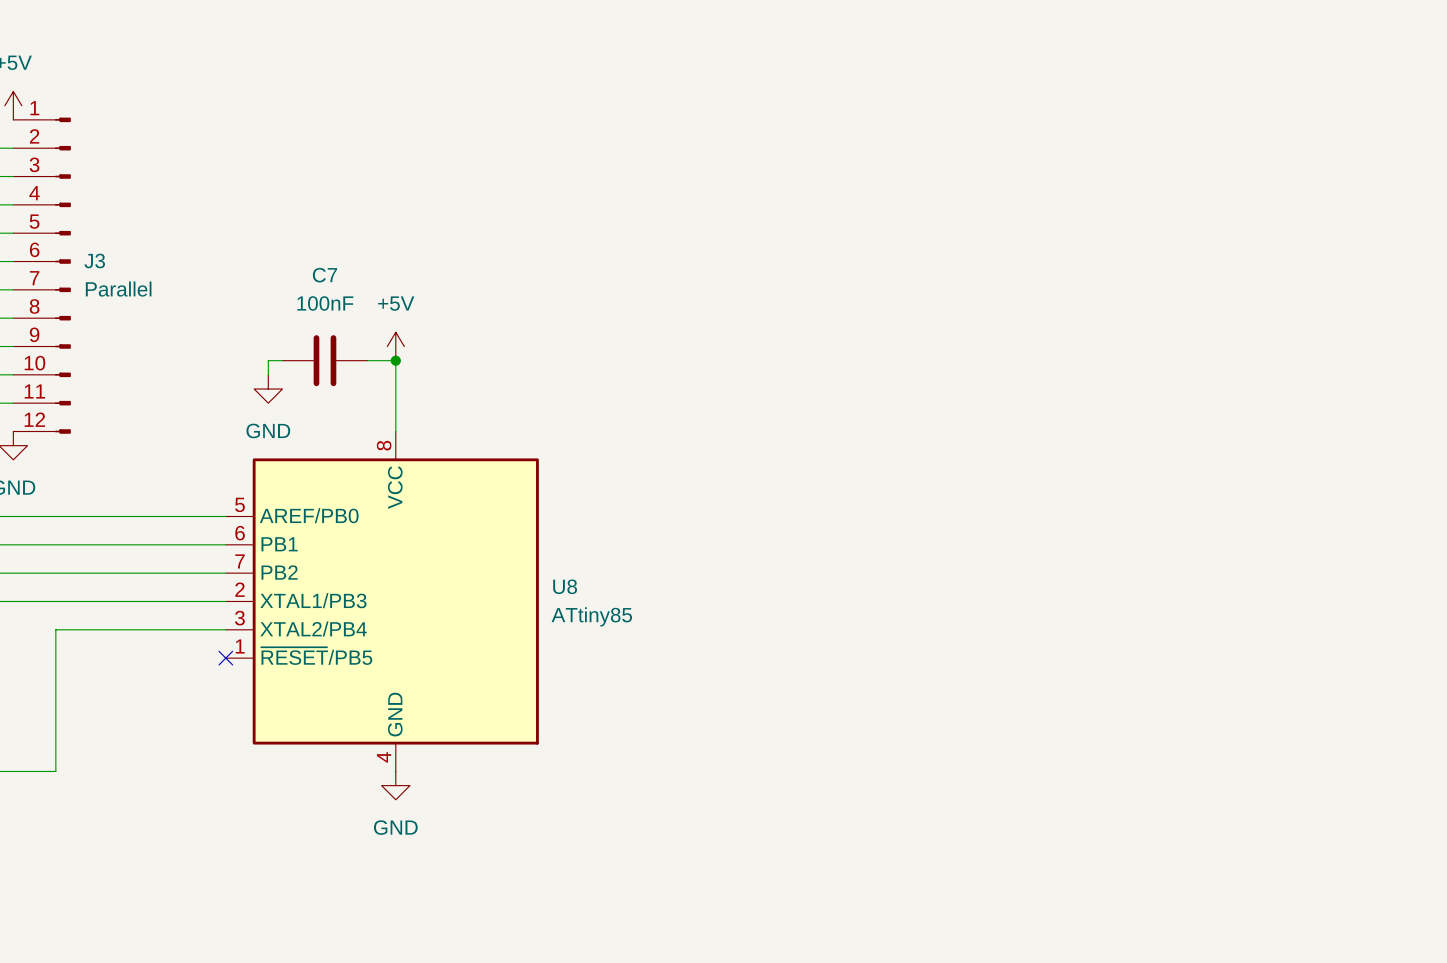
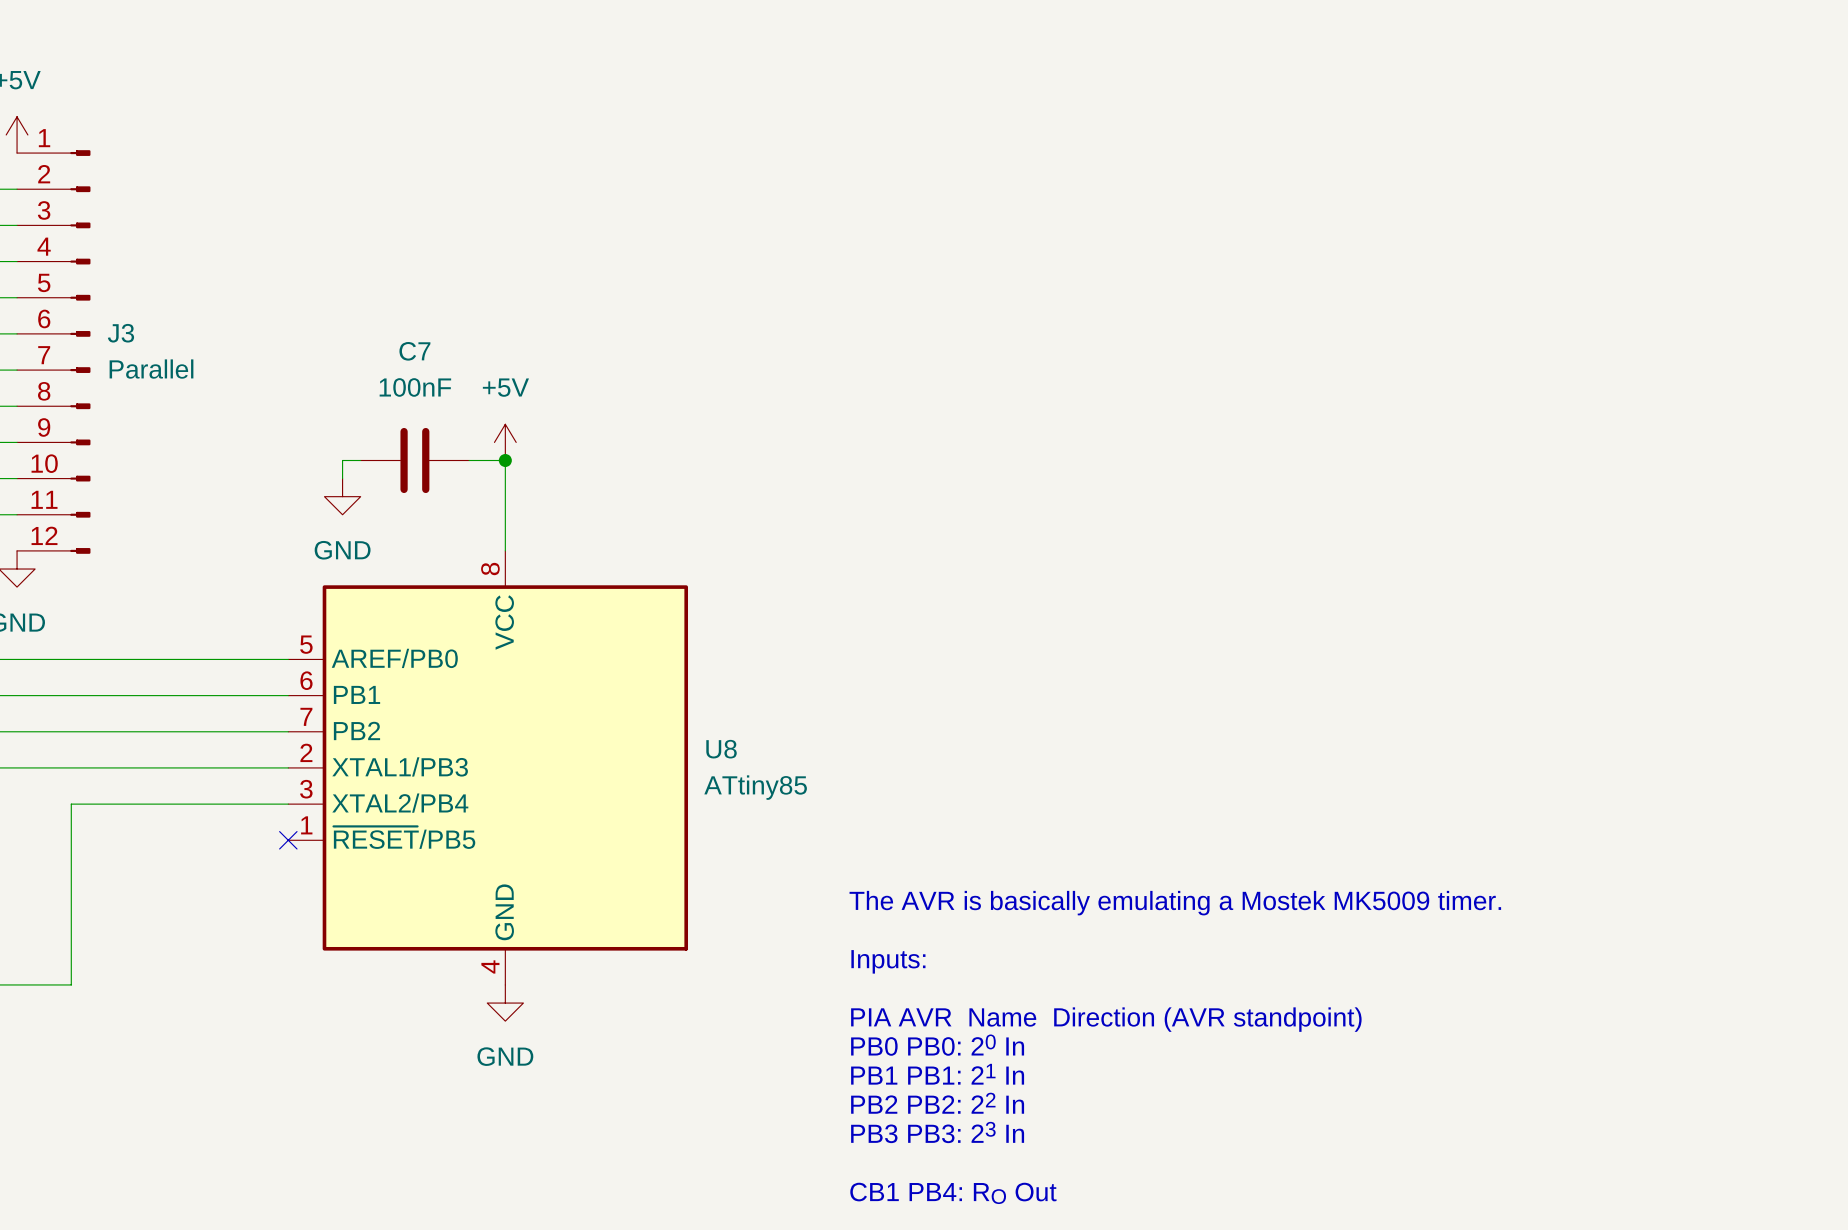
text: none -> The AVR is basically emulating a Mostek MK5009 timer. (1175, 903)
text: none -> Inputs: (888, 961)
text: none -> PIA AVR Name Direction (AVR standpoint) (1106, 1019)
text: none -> PB0 PB0: 20 In (937, 1045)
text: none -> PB1 PB1: 21 In (937, 1074)
text: none -> PB2 PB2: 22 In (937, 1103)
text: none -> PB3 PB3: 23 In (937, 1132)
text: none -> CB1 PB4: RO Out (953, 1193)

